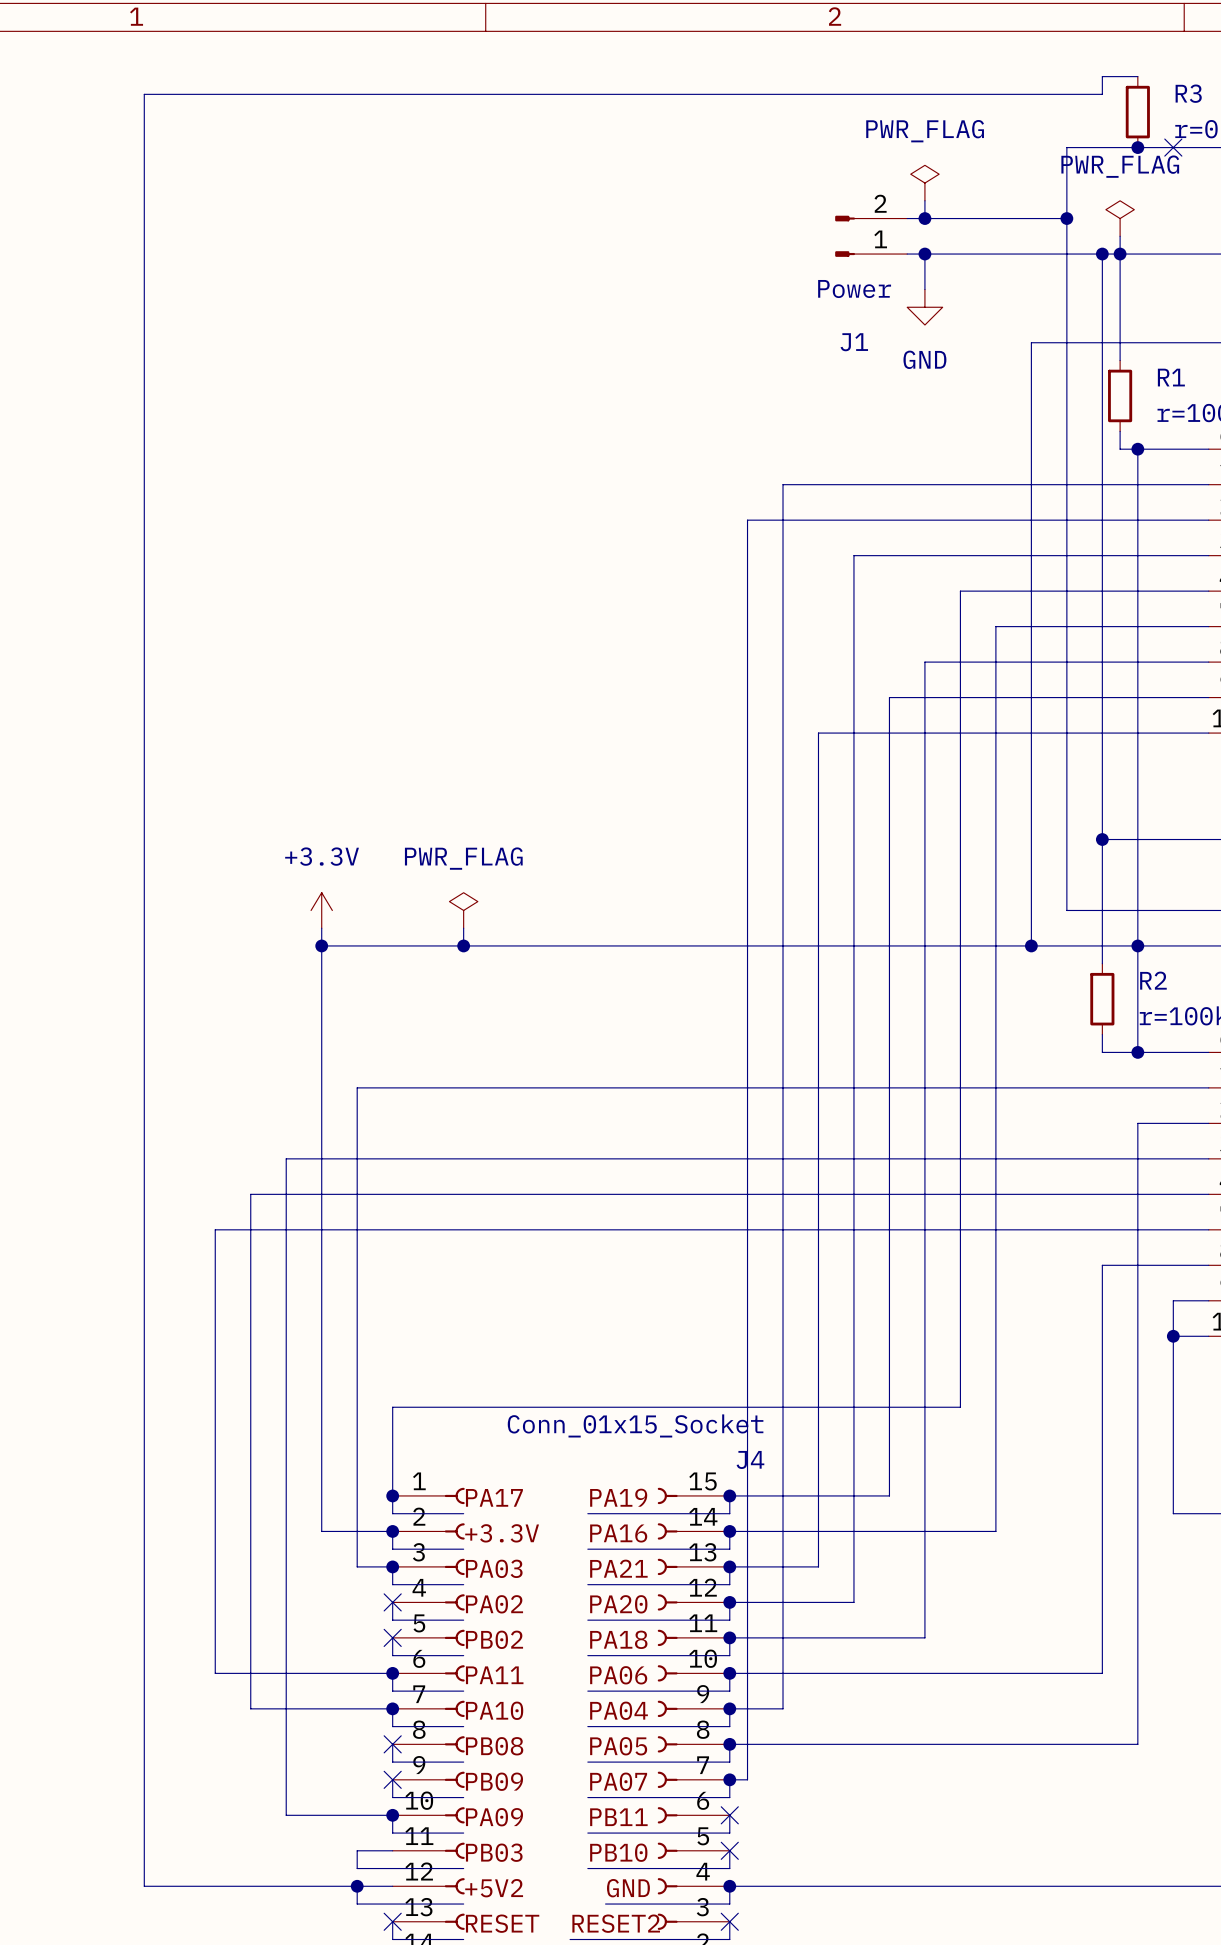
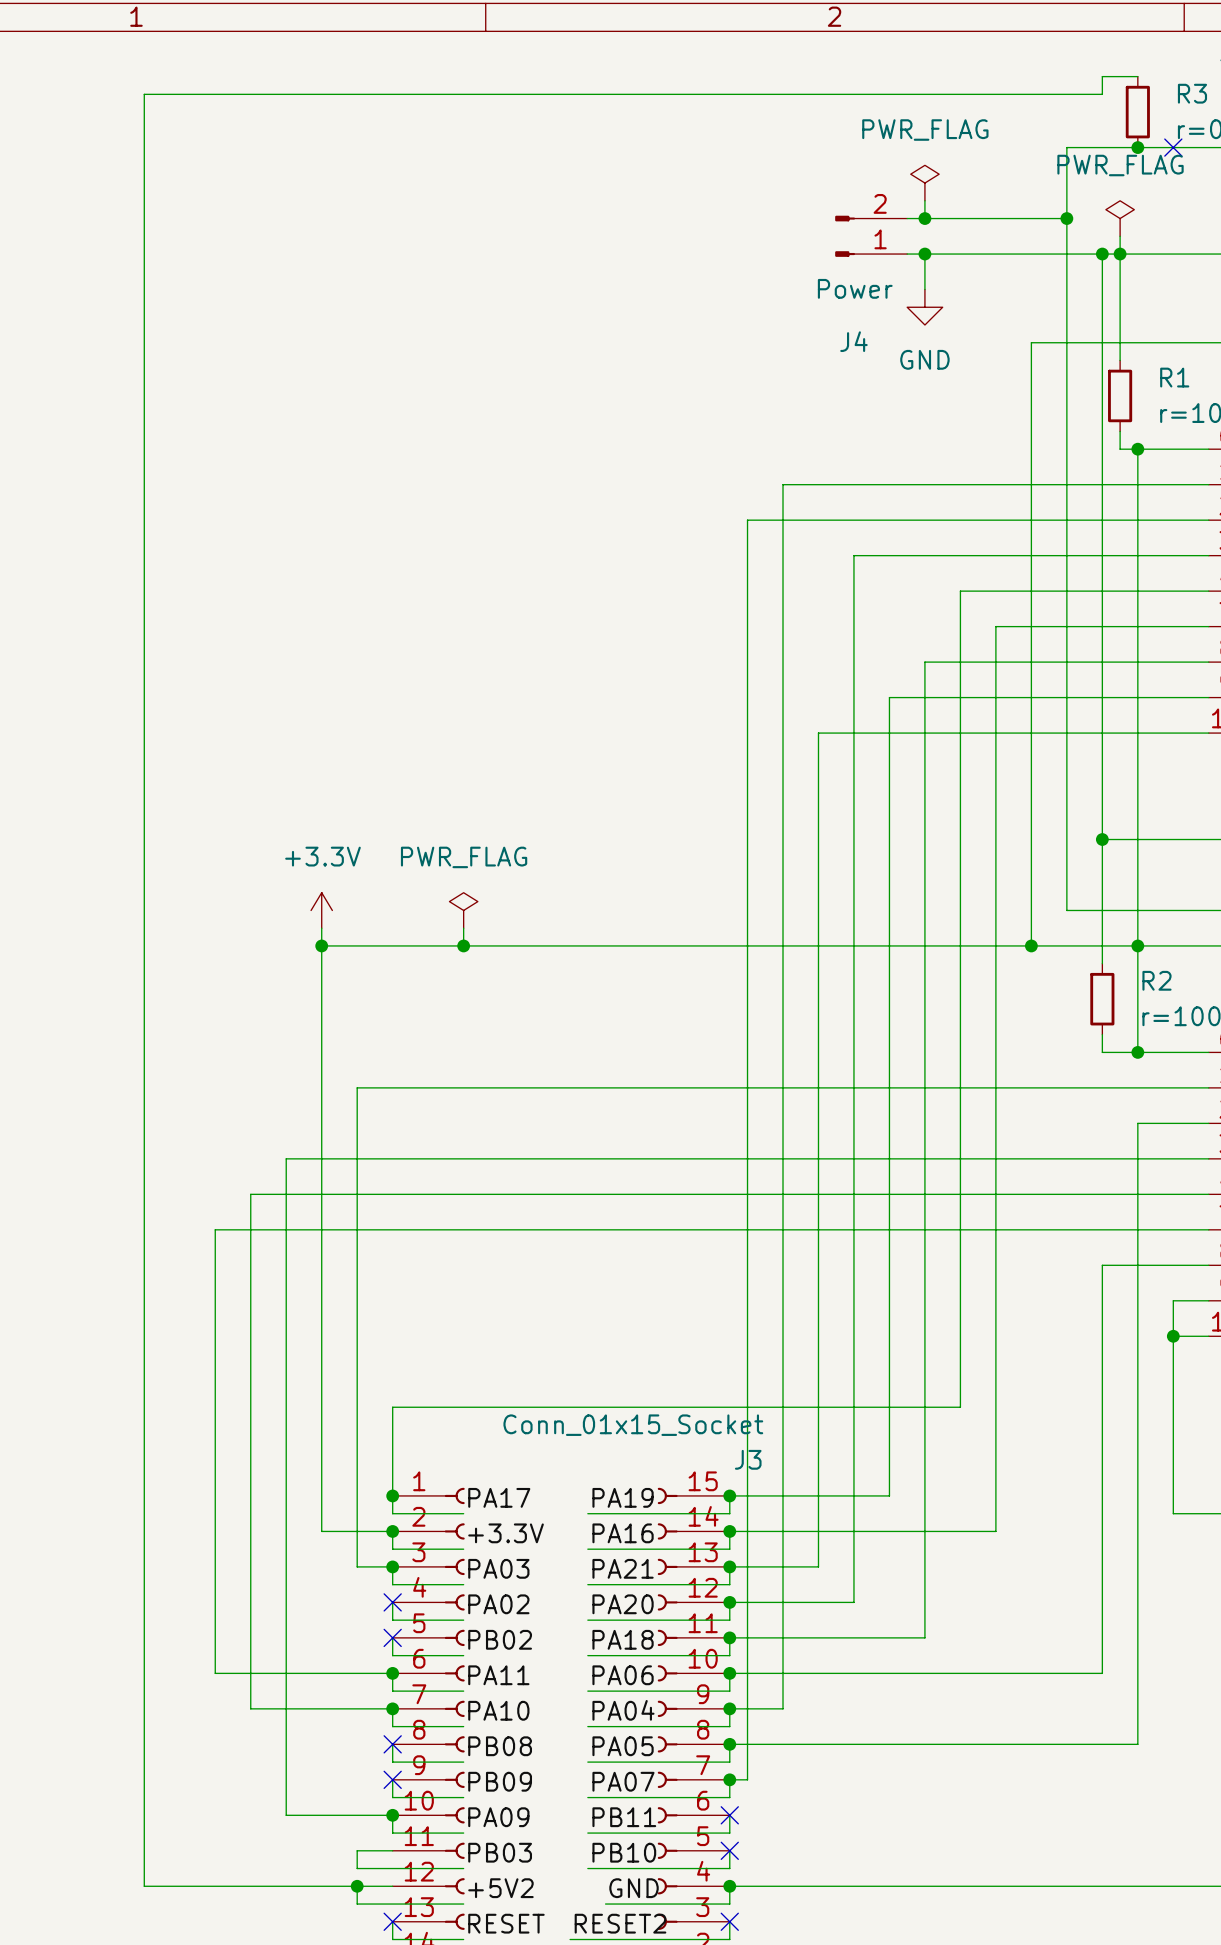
J1 name: J1 (854, 342) -> J4 (853, 341)
J4 name: J4 (750, 1459) -> J3 (748, 1459)

